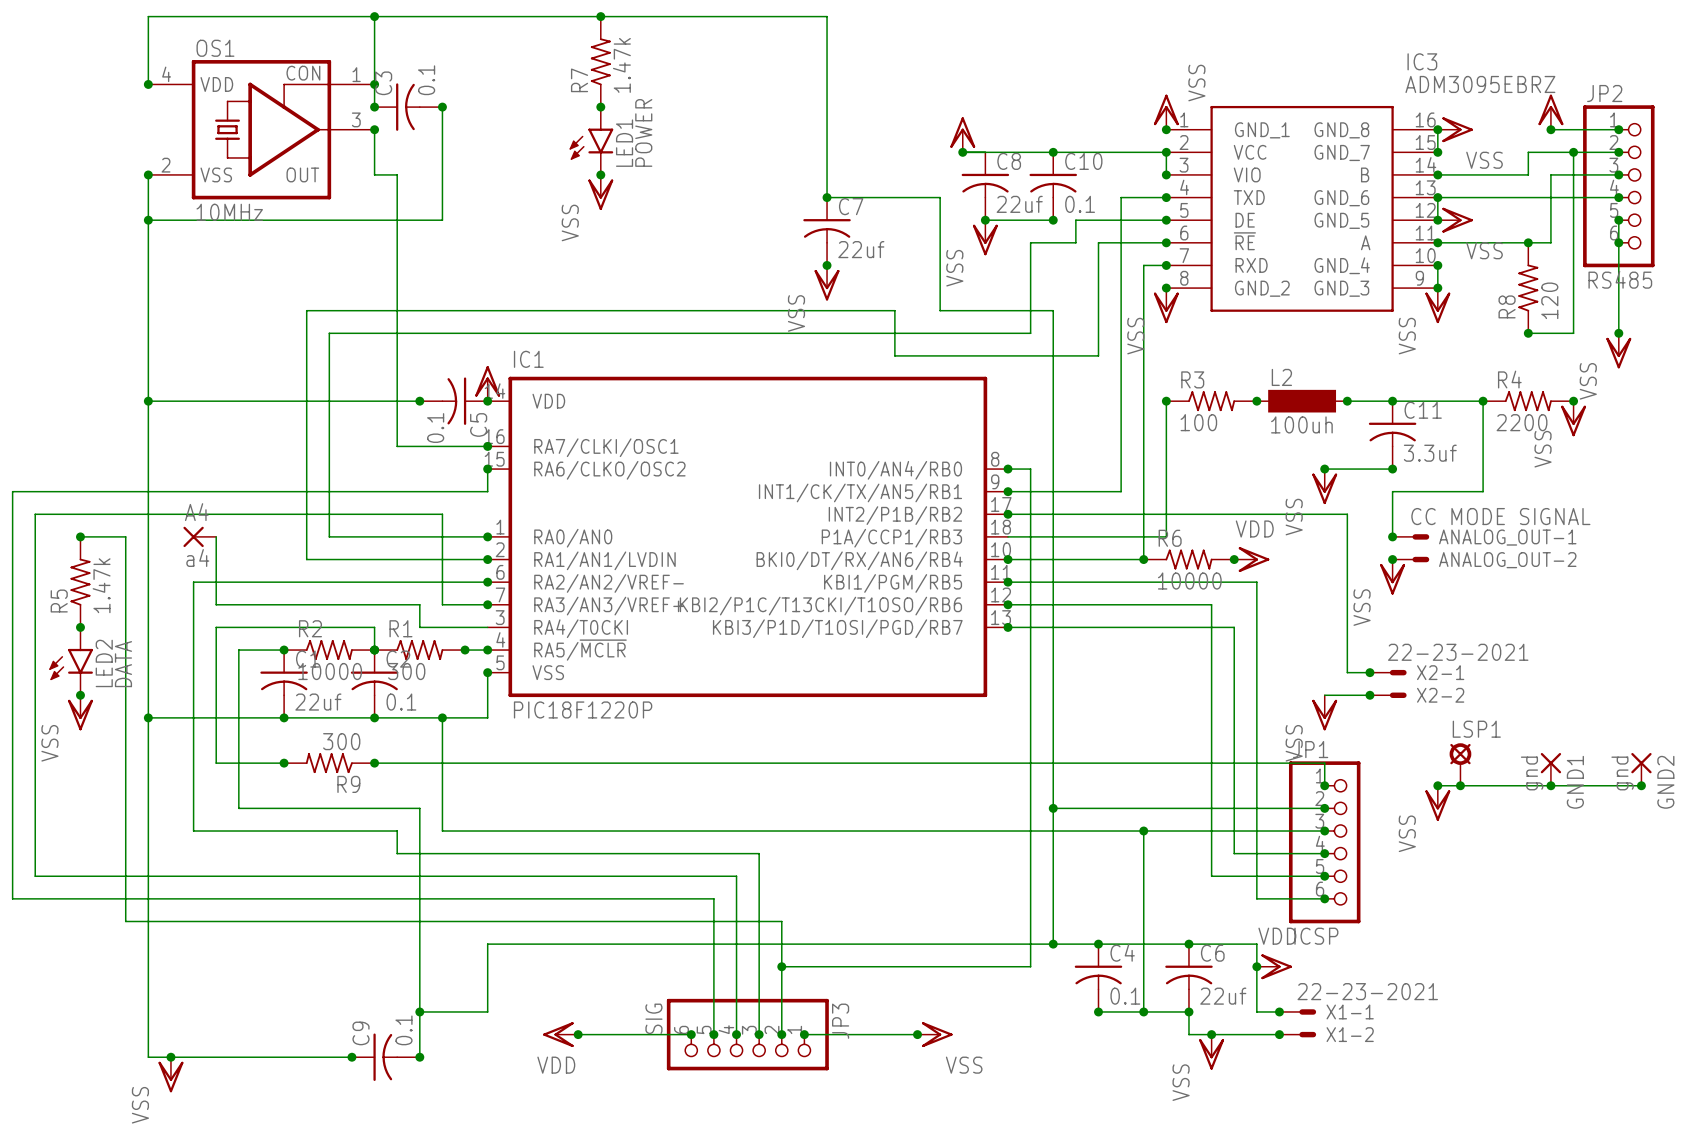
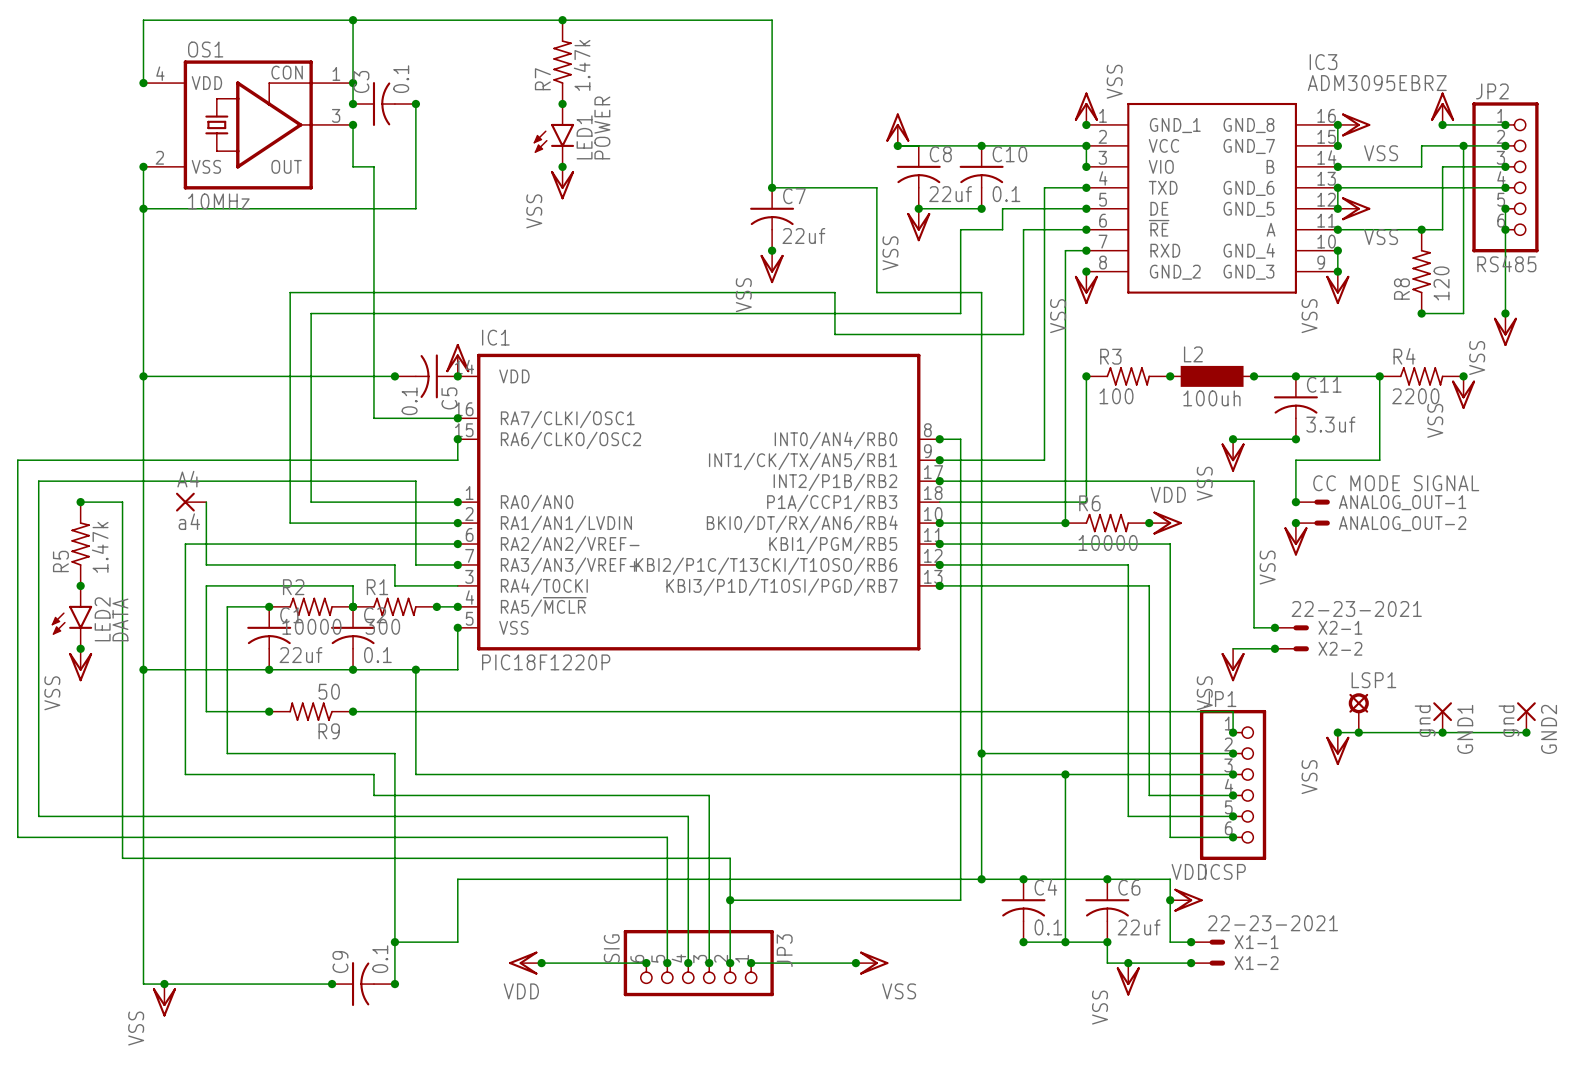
R9 value: 300 (341, 741) -> 50 (329, 691)

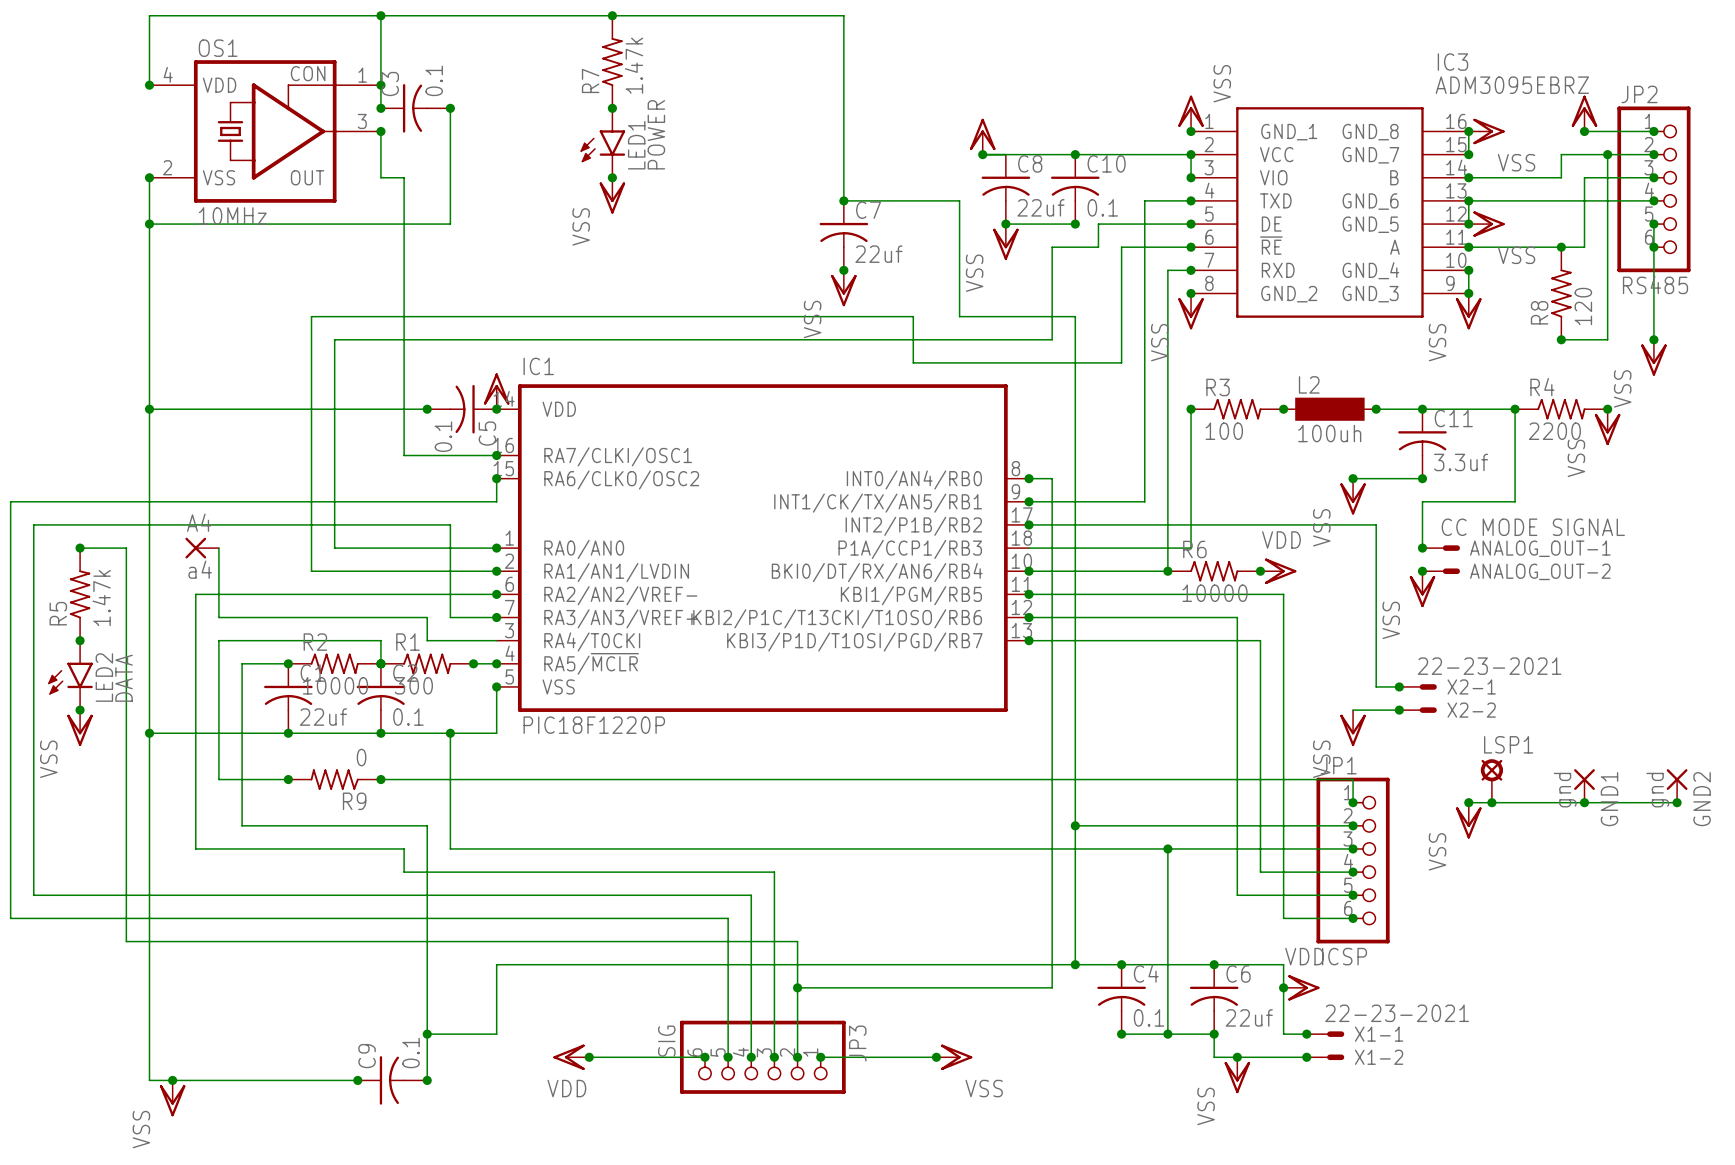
R9 value: 50 (329, 691) -> 0 (361, 757)

